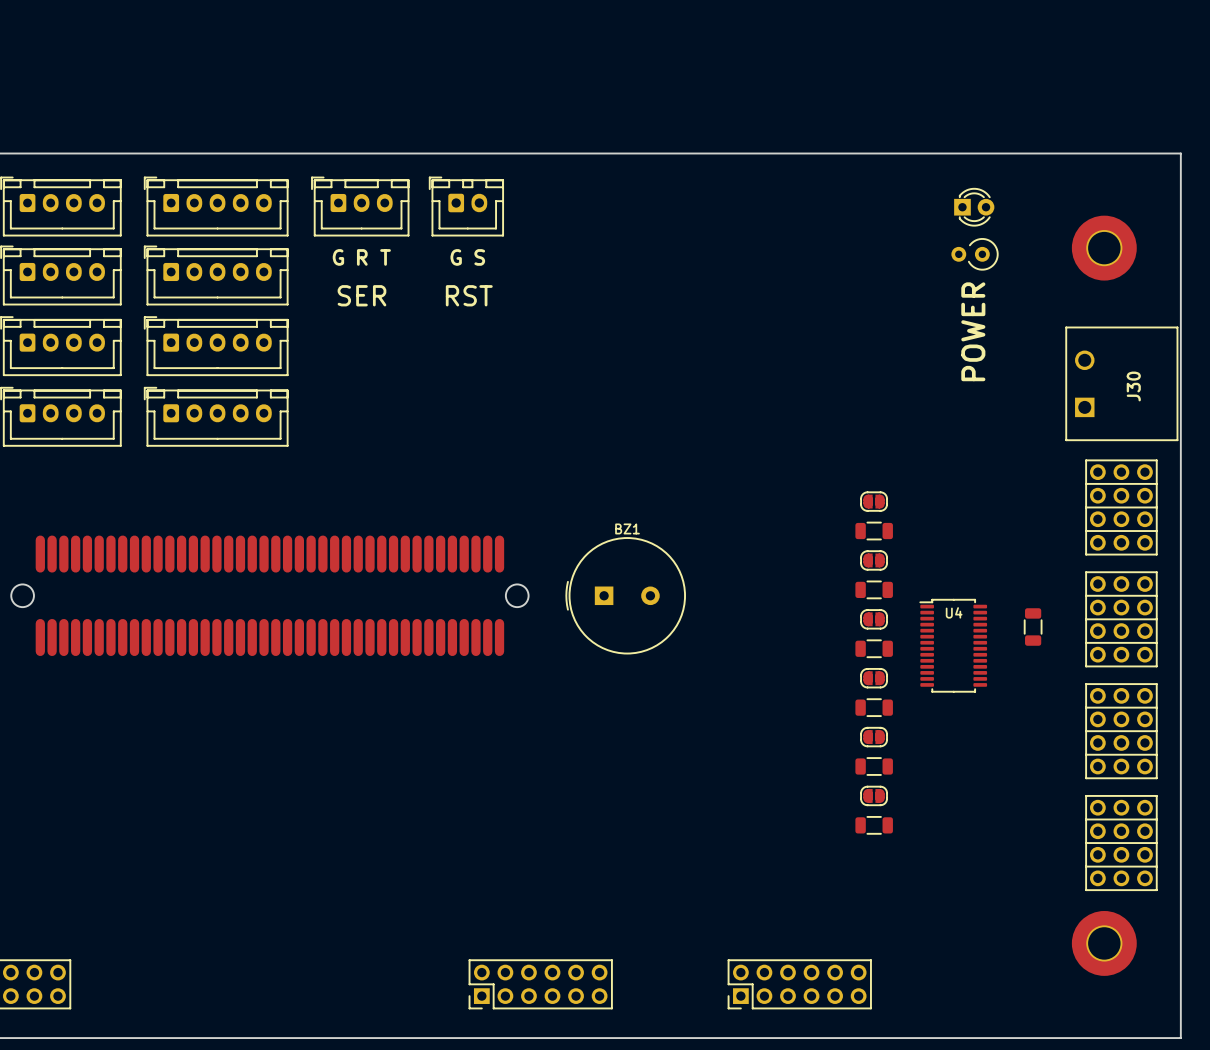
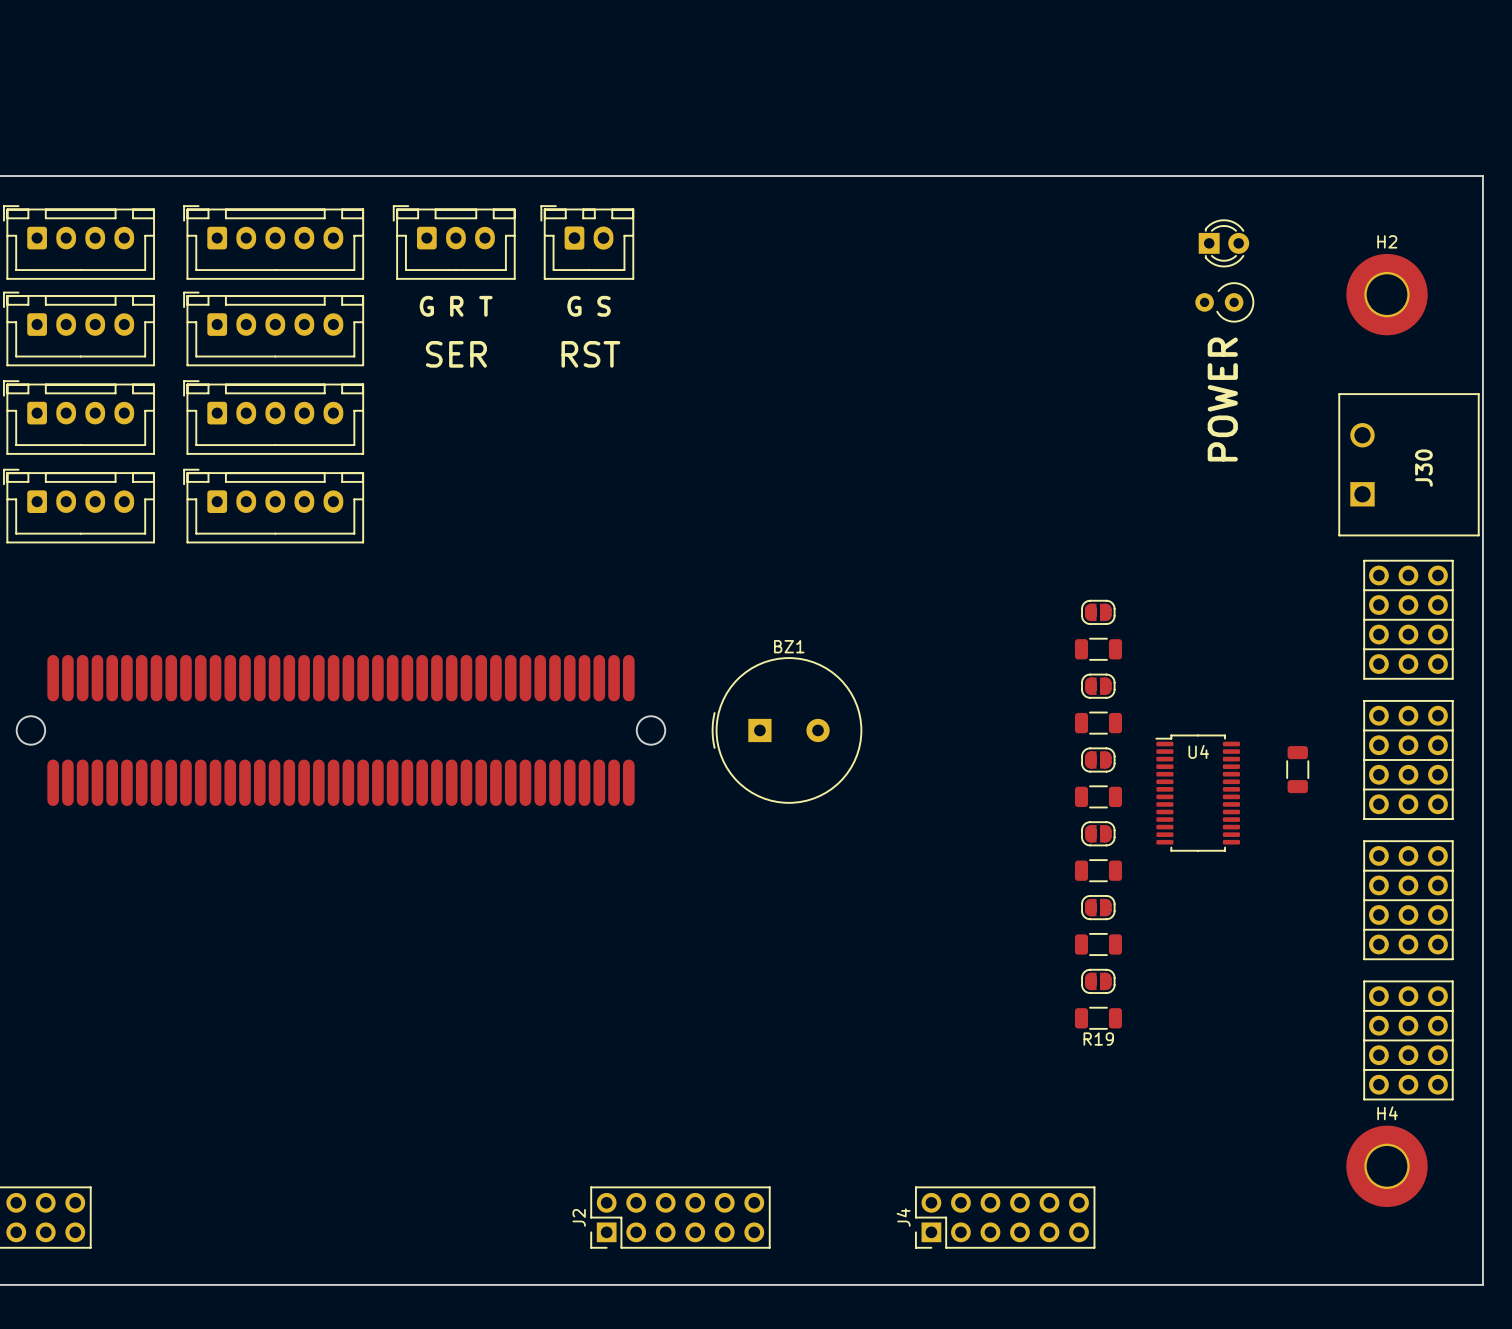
H2 name: none -> H2 (1387, 241)
R19 name: none -> R19 (1098, 1039)
H4 name: none -> H4 (1387, 1113)
J2 name: none -> J2 (579, 1217)
J4 name: none -> J4 (903, 1217)

